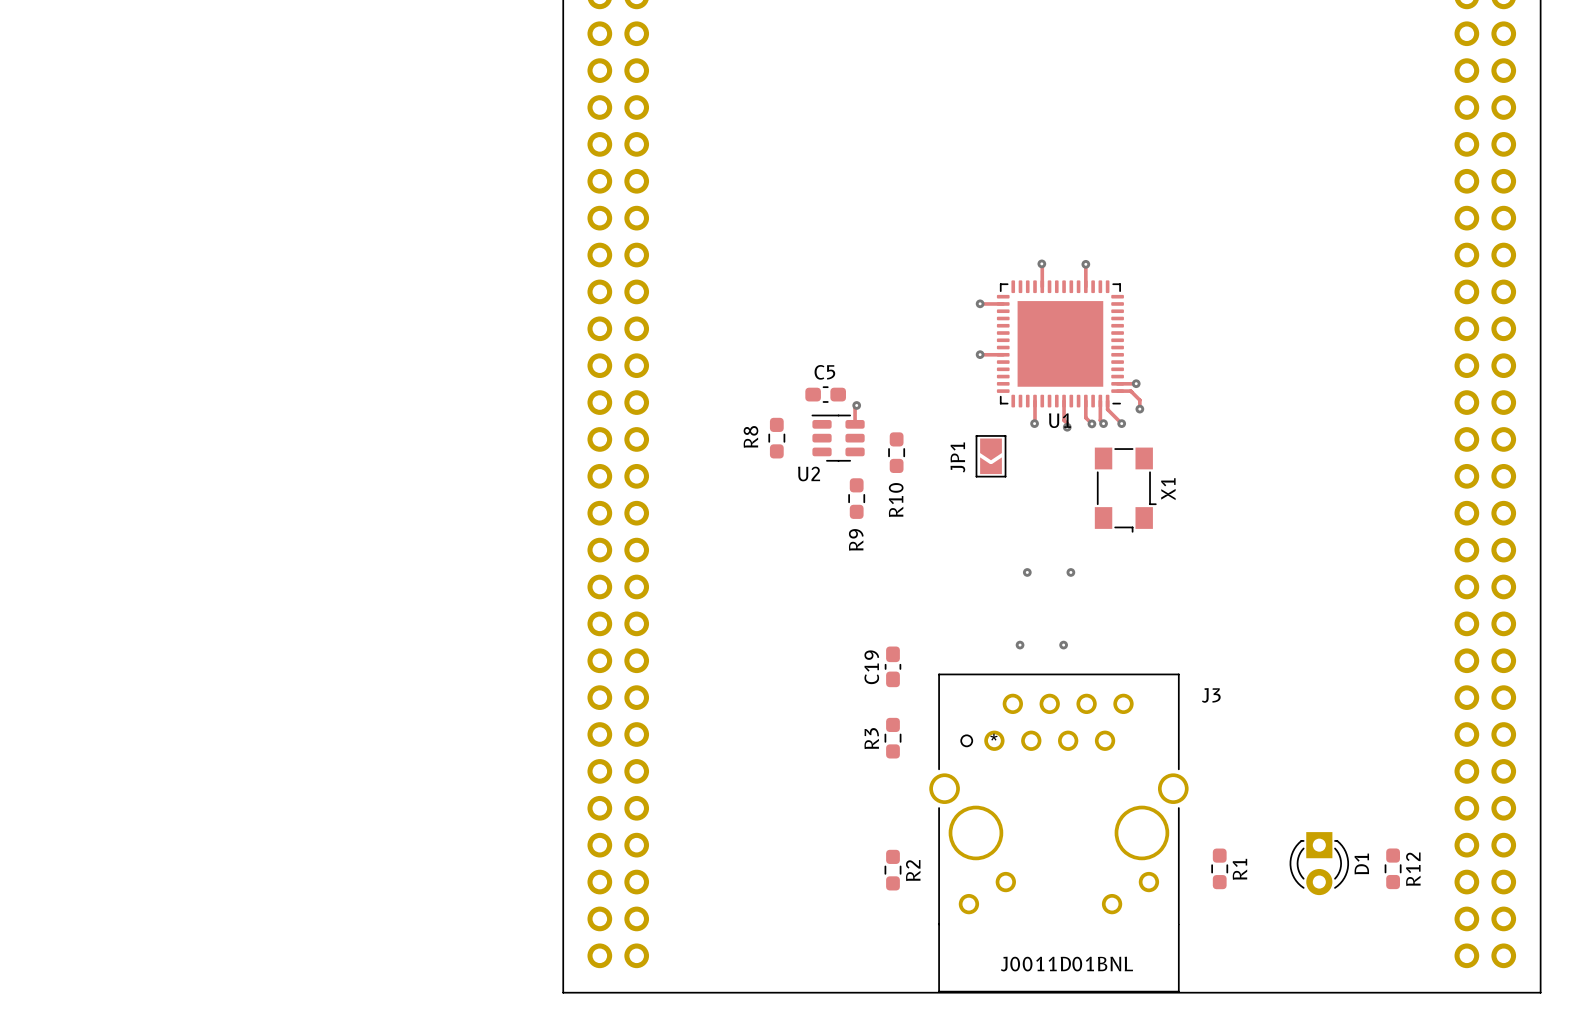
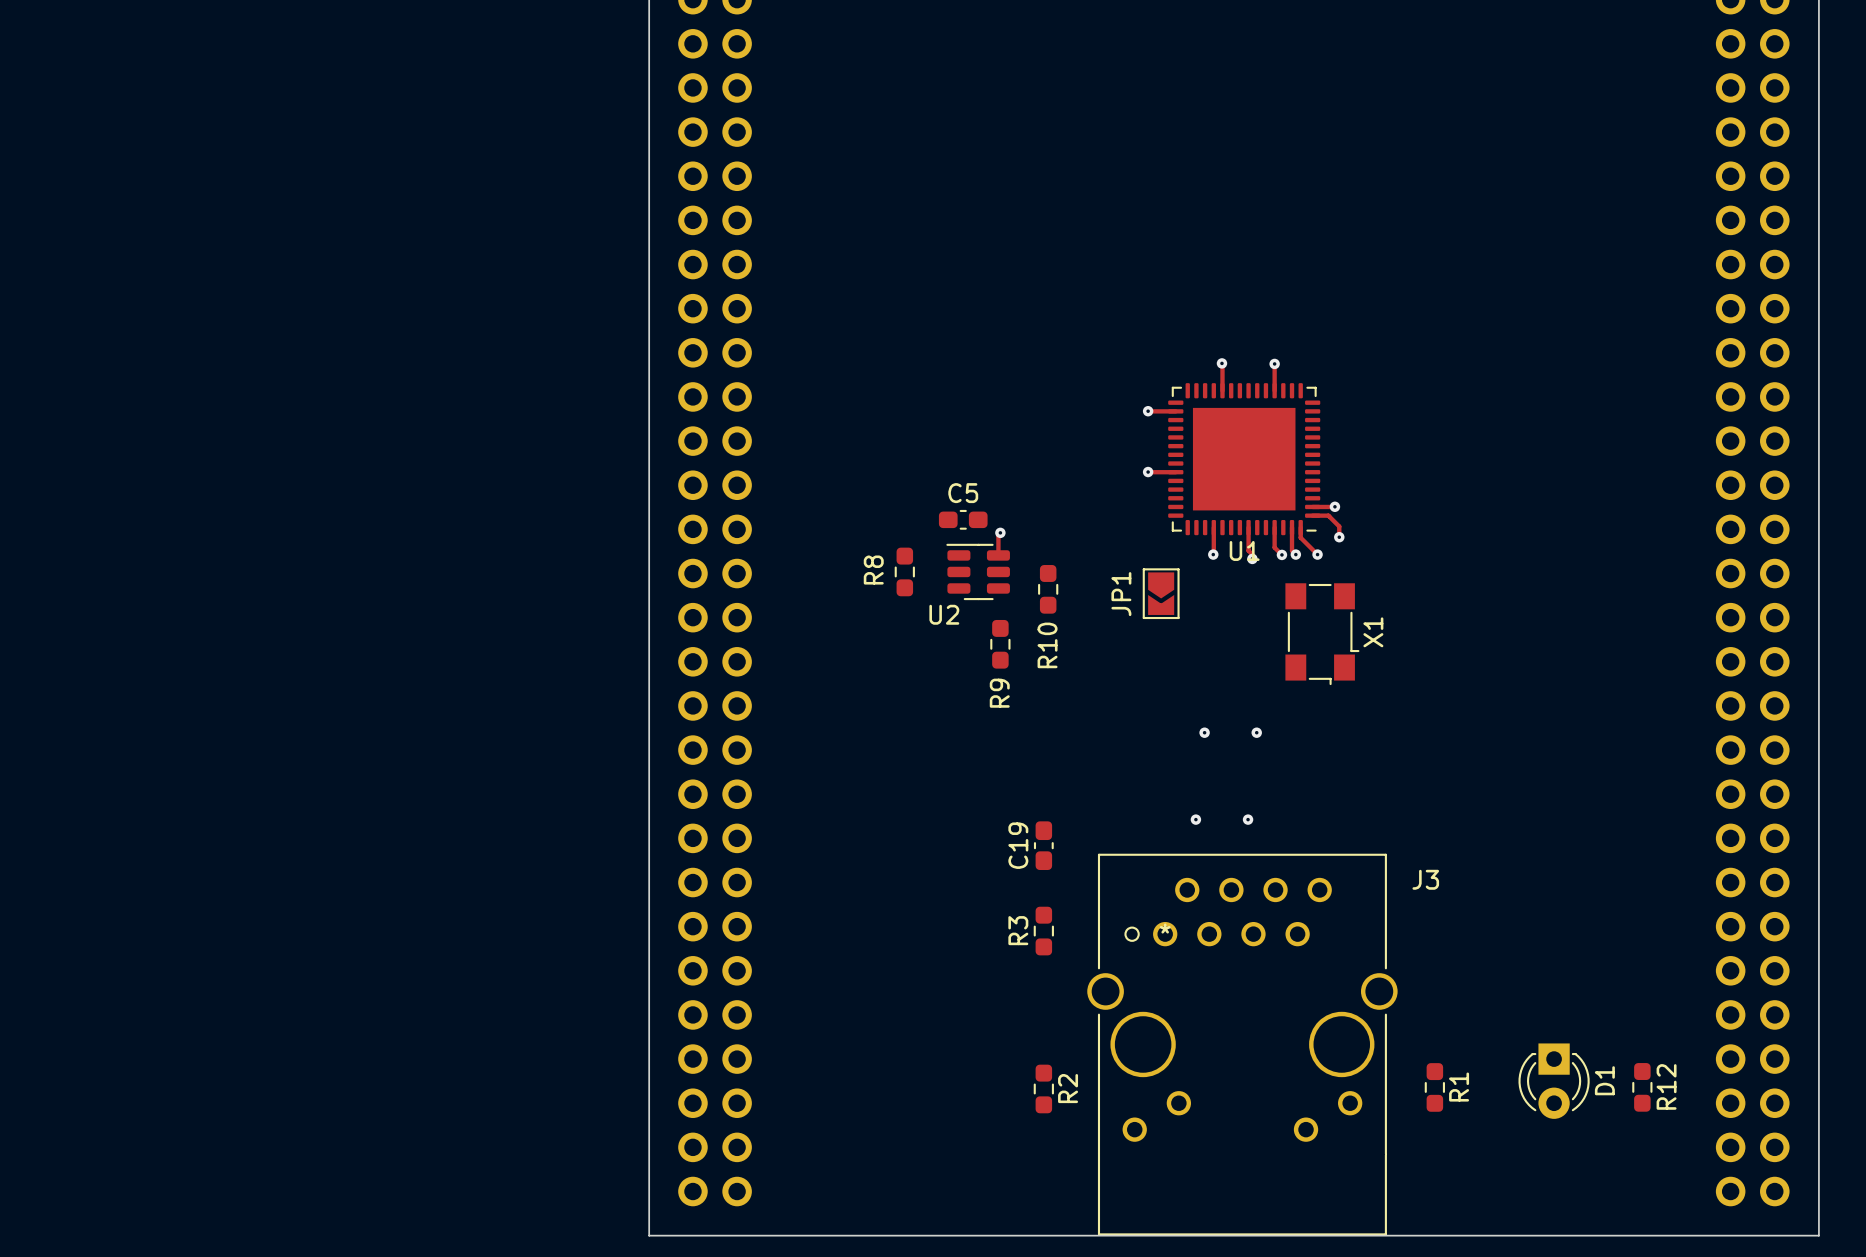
J3 value: J0011D01BNL (1066, 964) -> none

